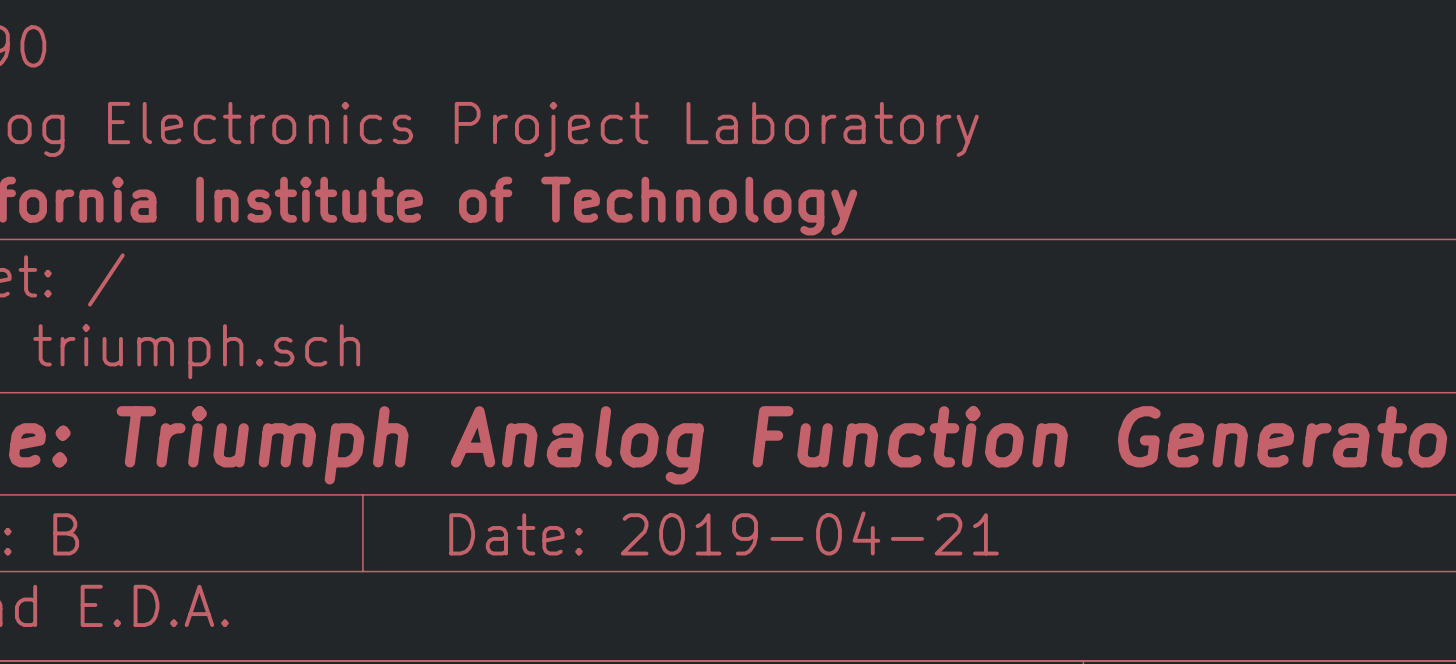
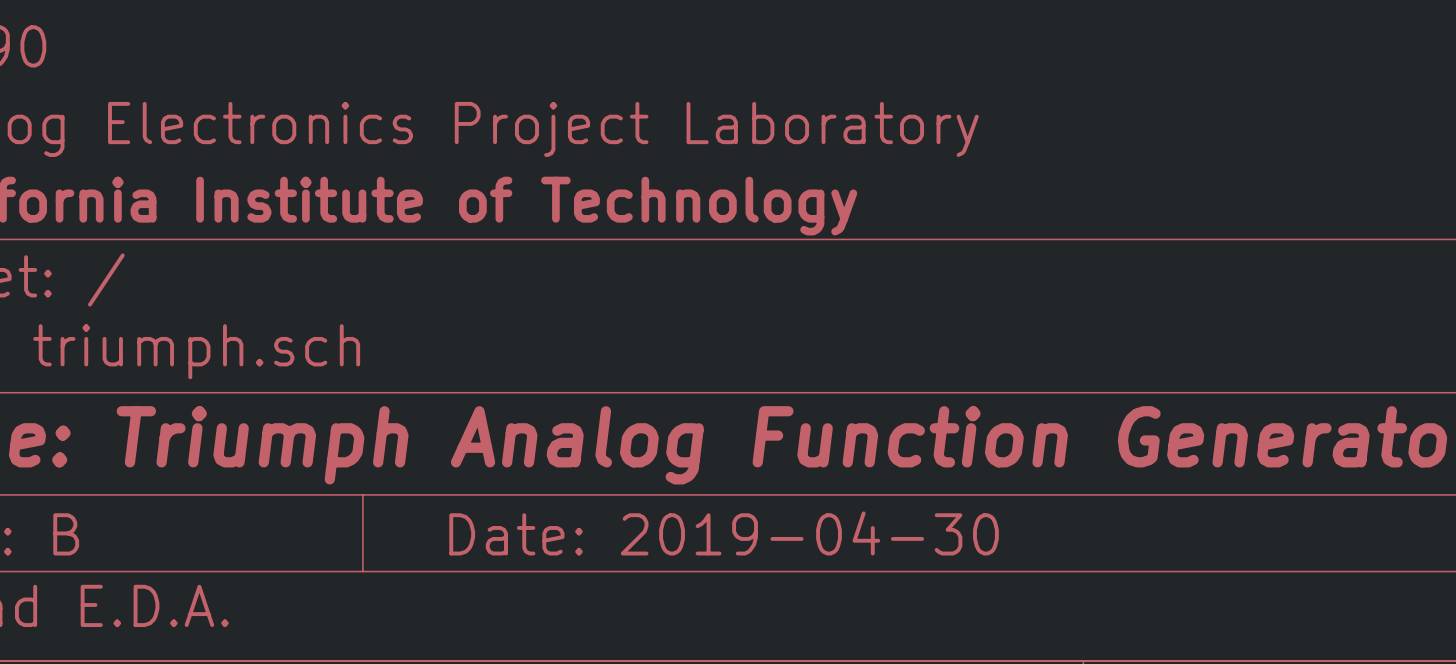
title block: Date: 2019-04-21 (724, 533) -> Date: 2019-04-30 (724, 533)

